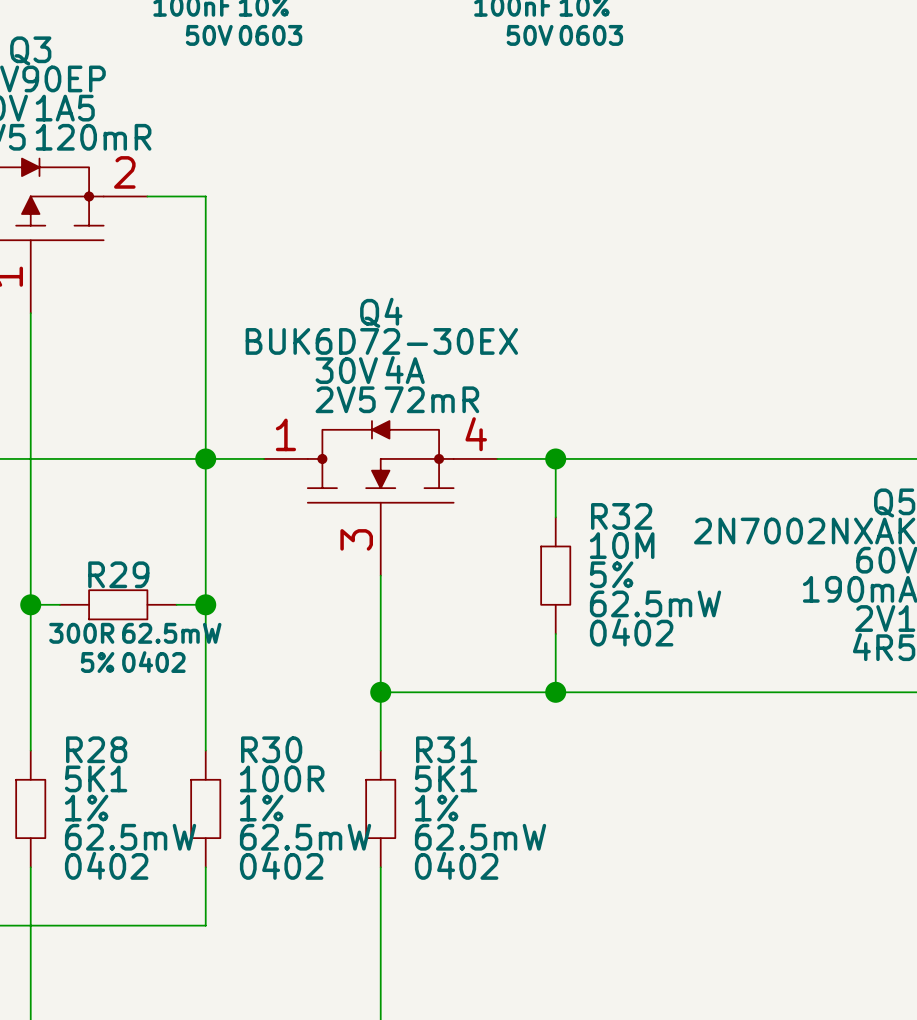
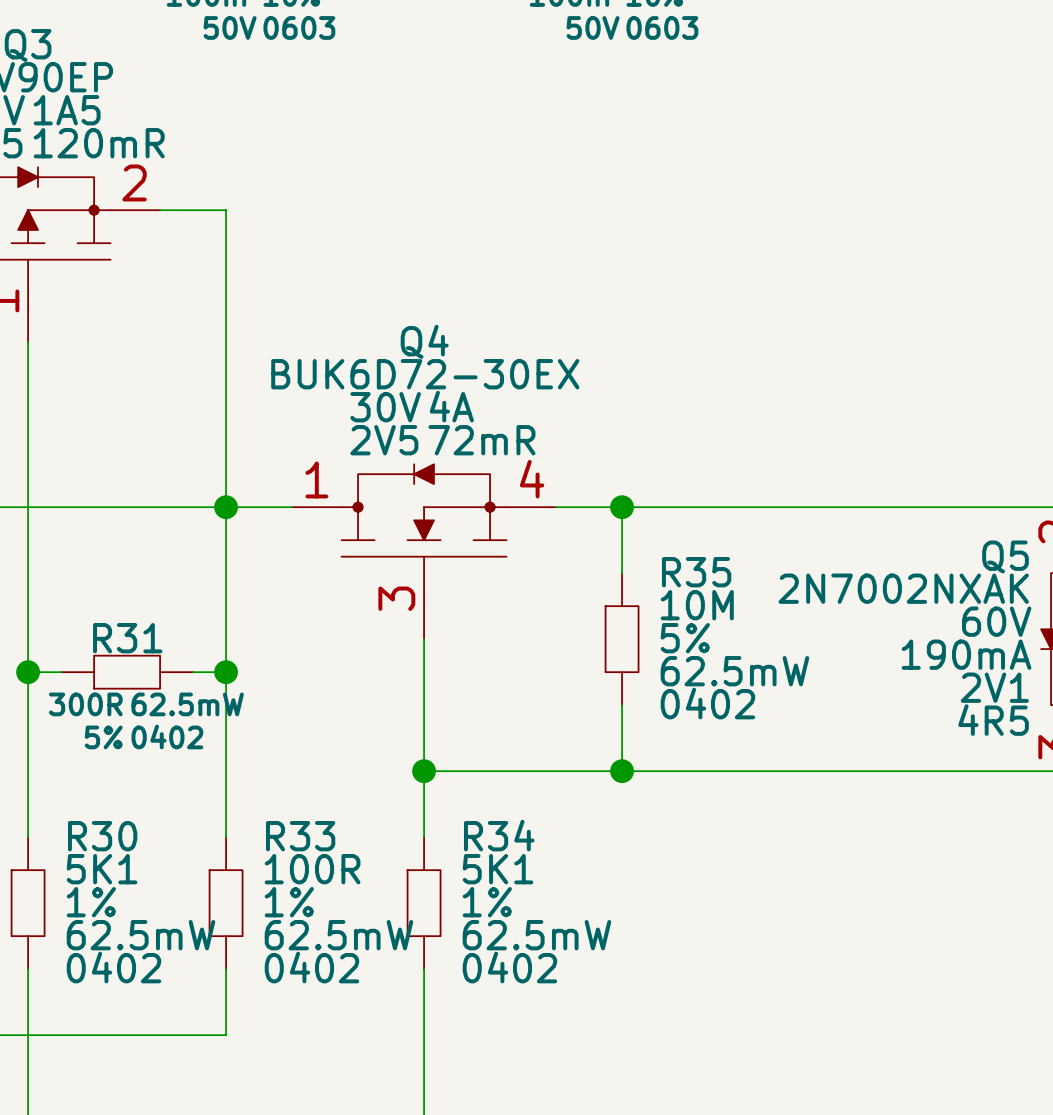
R32 name: R32 (621, 516) -> R35 (696, 572)
R29 name: R29 (118, 574) -> R31 (127, 638)
R28 name: R28 (96, 749) -> R30 (102, 836)
R30 name: R30 (271, 749) -> R33 (300, 836)
R31 name: R31 (446, 749) -> R34 (499, 835)

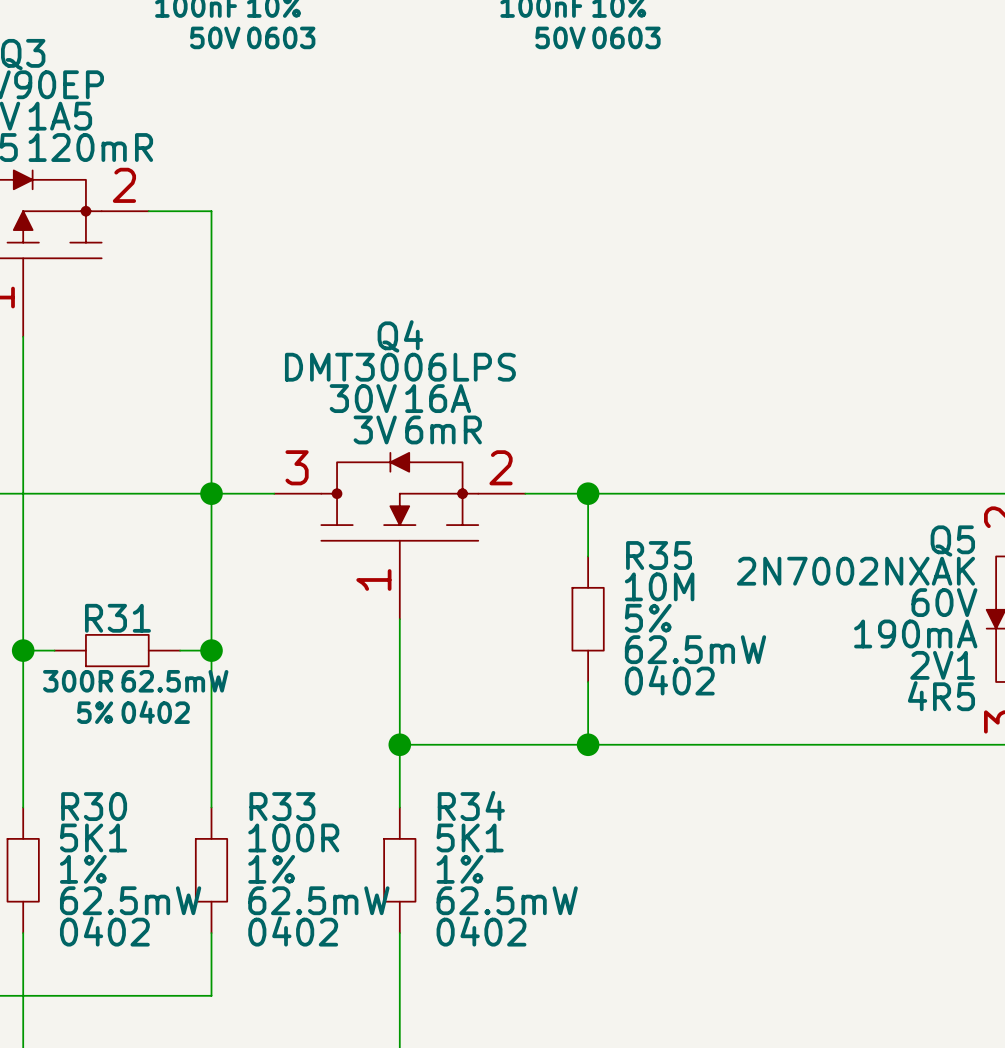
Q4 value: BUK6D72-30EX (425, 374) -> DMT3006LPS (400, 367)
Q4 text: 4A (451, 406) -> 16A (438, 398)
Q4 text: 2V5 (384, 440) -> 3V (375, 429)
Q4 text: 72mR (481, 440) -> 6mR (443, 429)
Q4 pin number: 1 (316, 479) -> 3 (297, 467)
Q4 pin number: 4 (532, 479) -> 2 (501, 467)
Q4 pin number: 3 (396, 598) -> 1 (373, 579)

